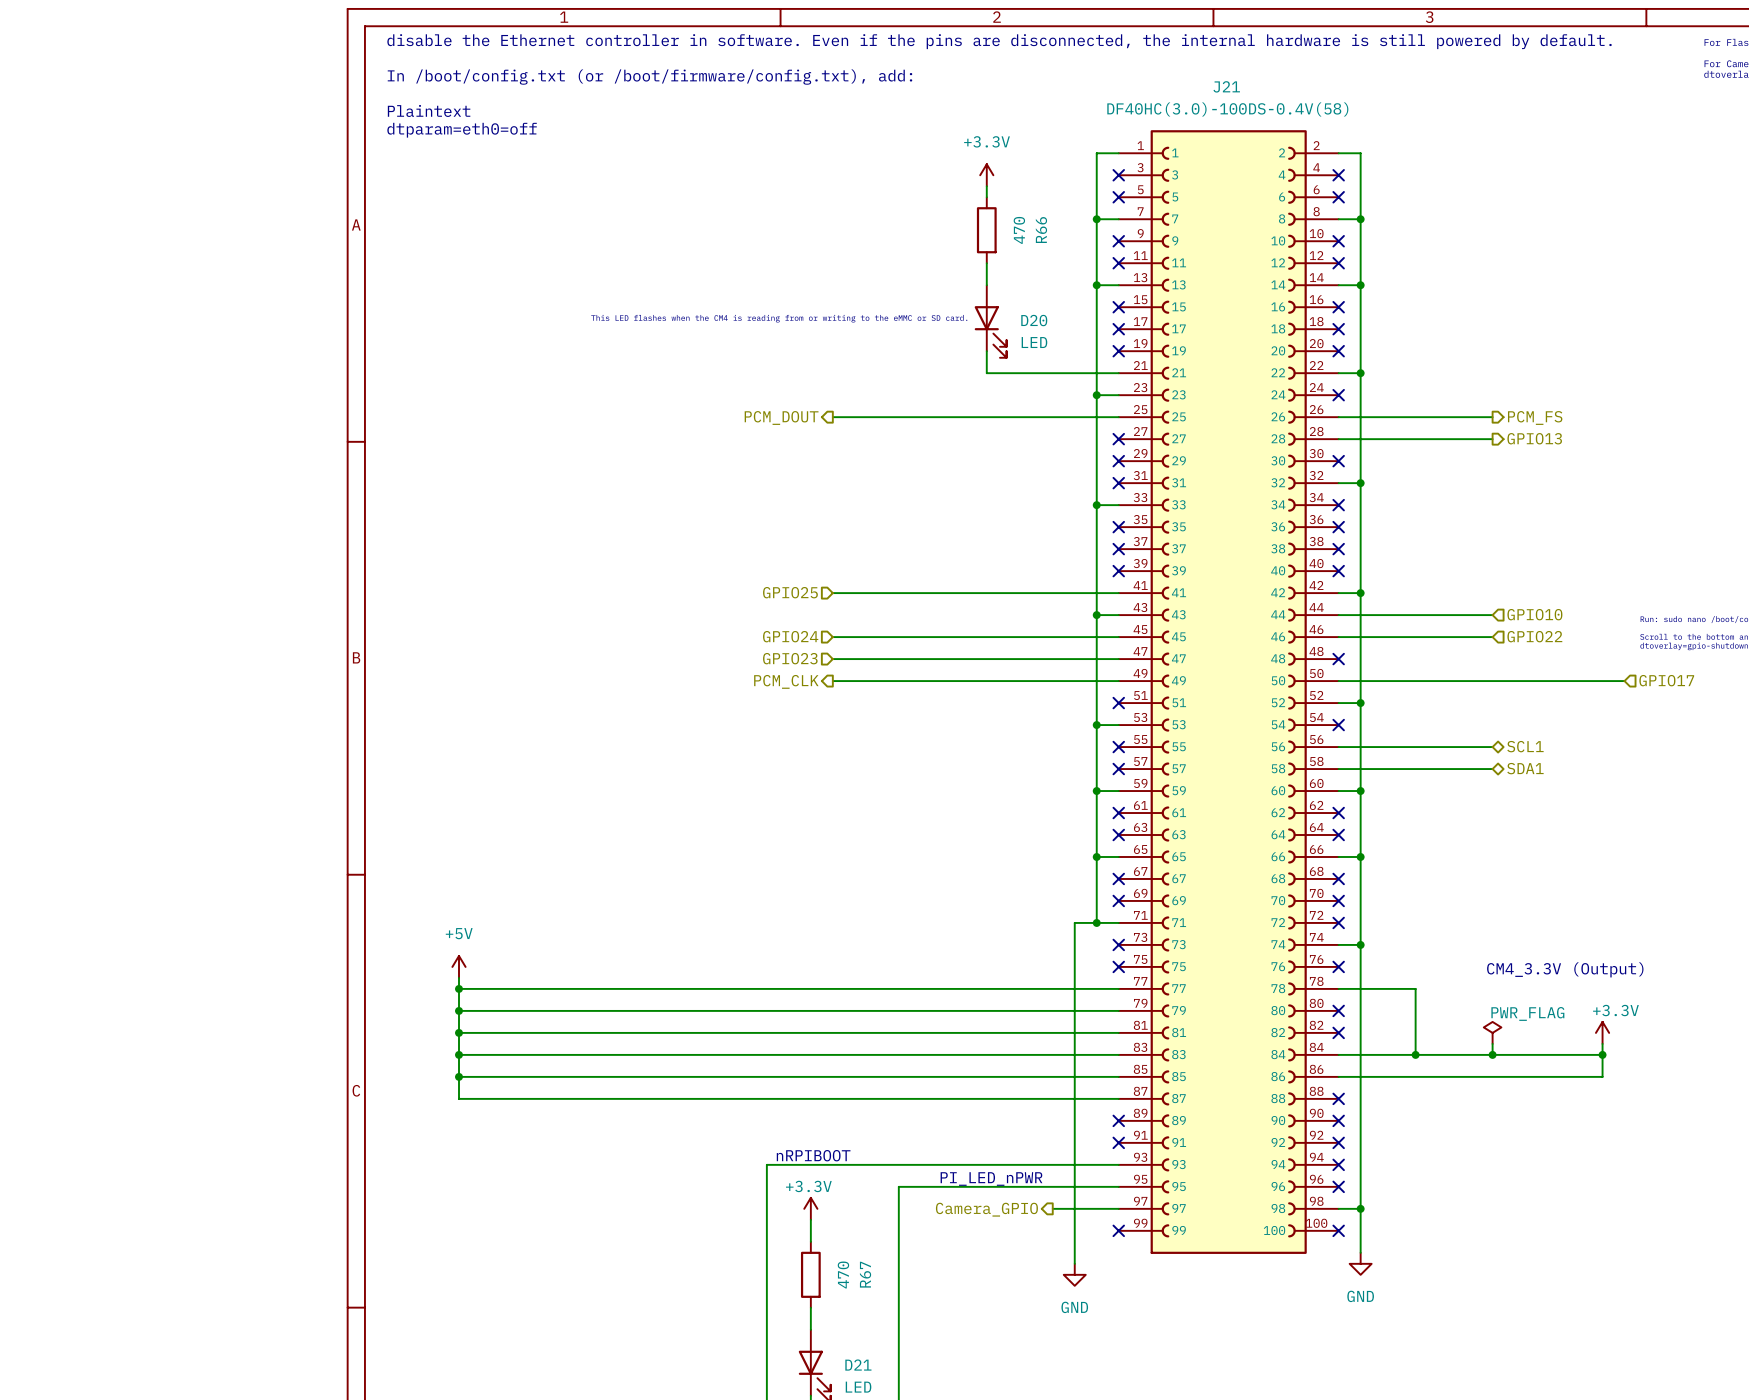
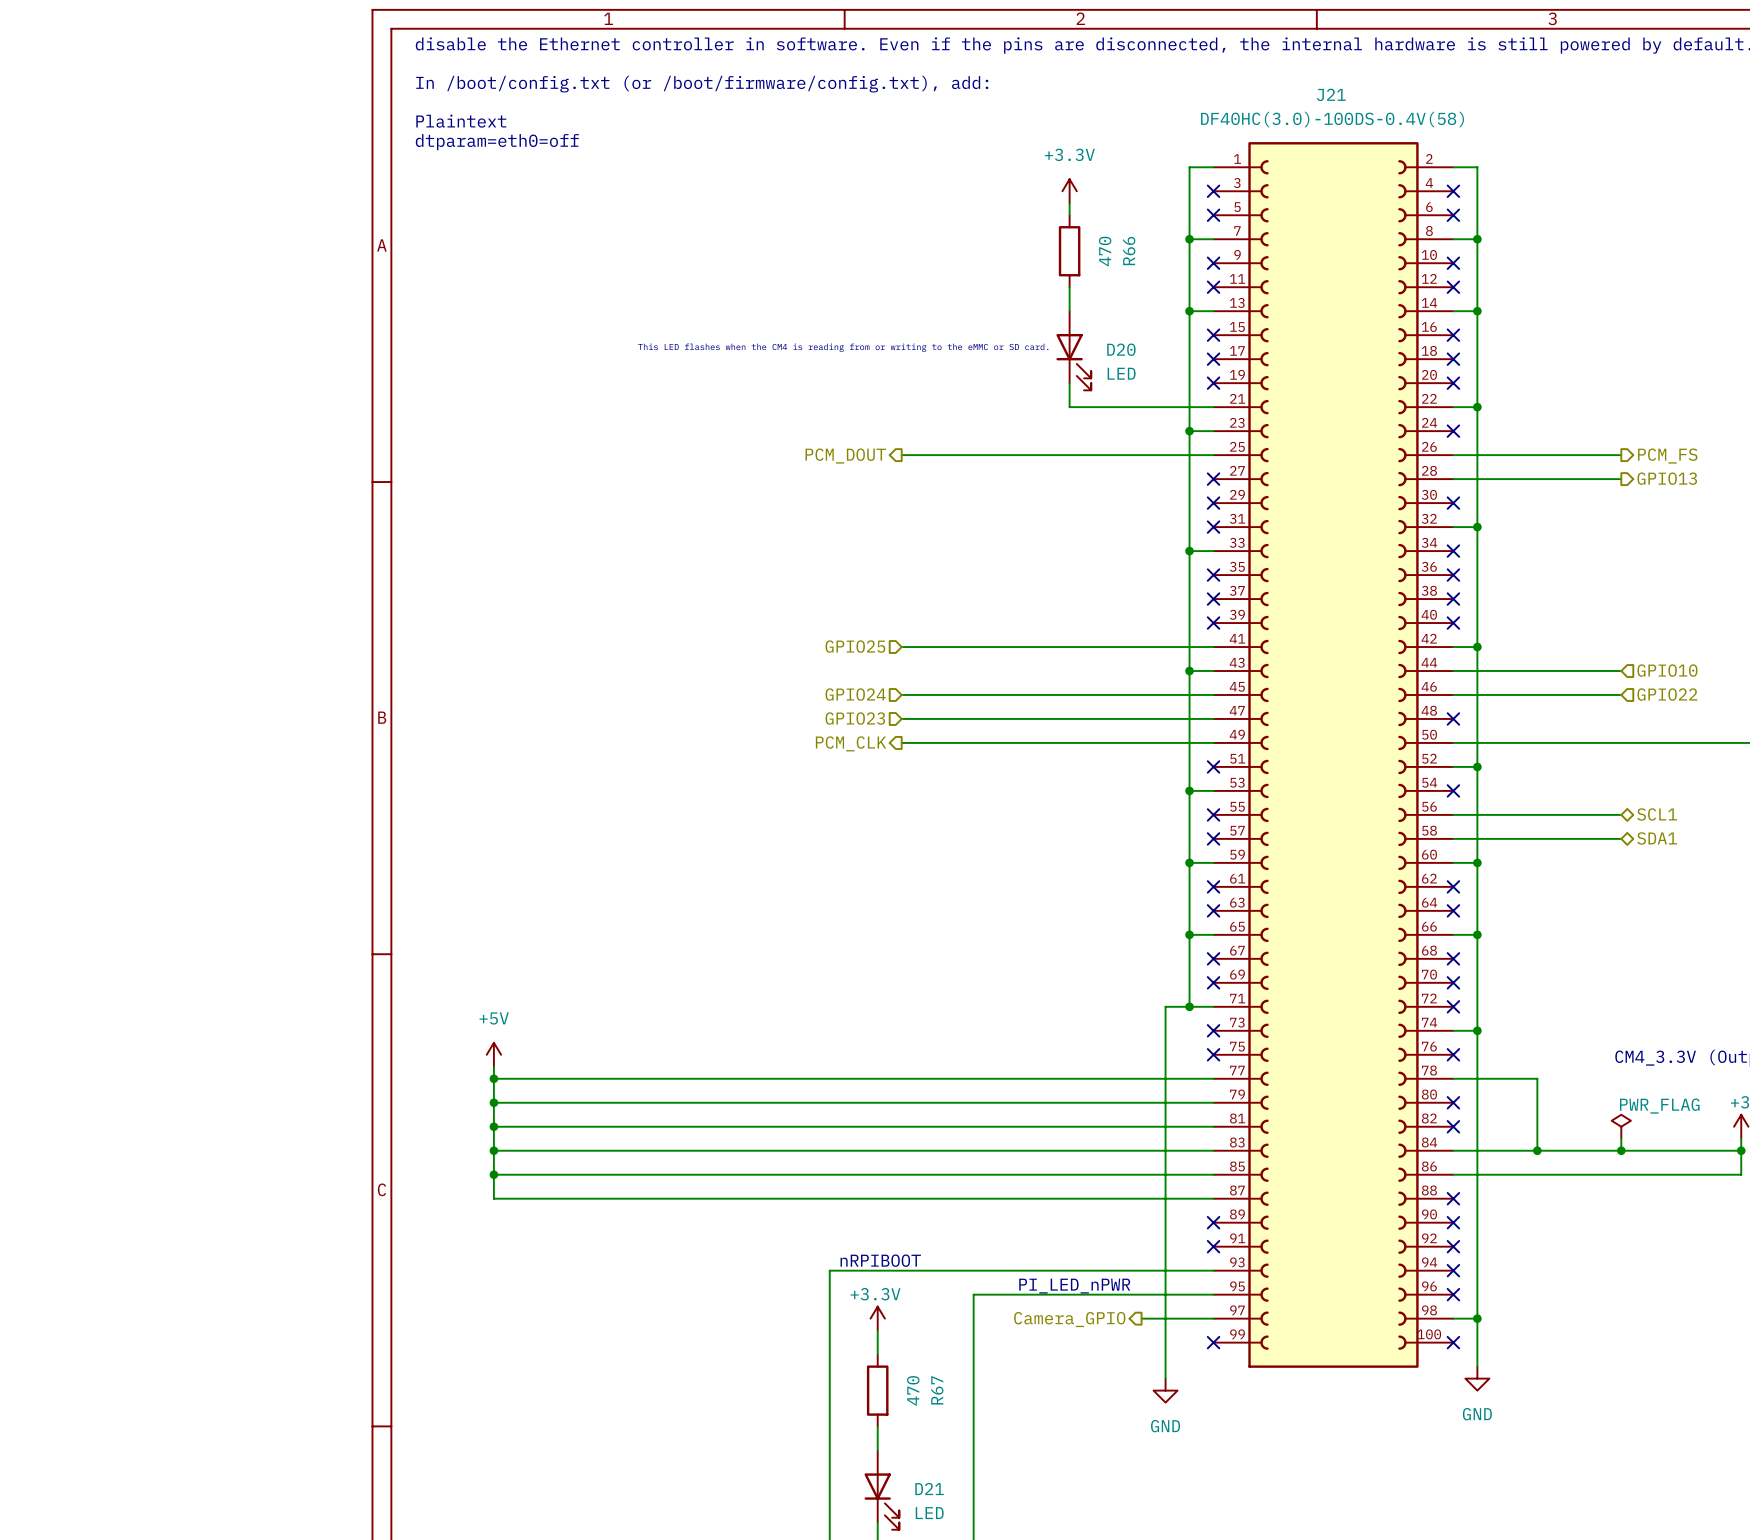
J21 symbol: [1118, 130, 1339, 1254] -> [1213, 142, 1454, 1368]

